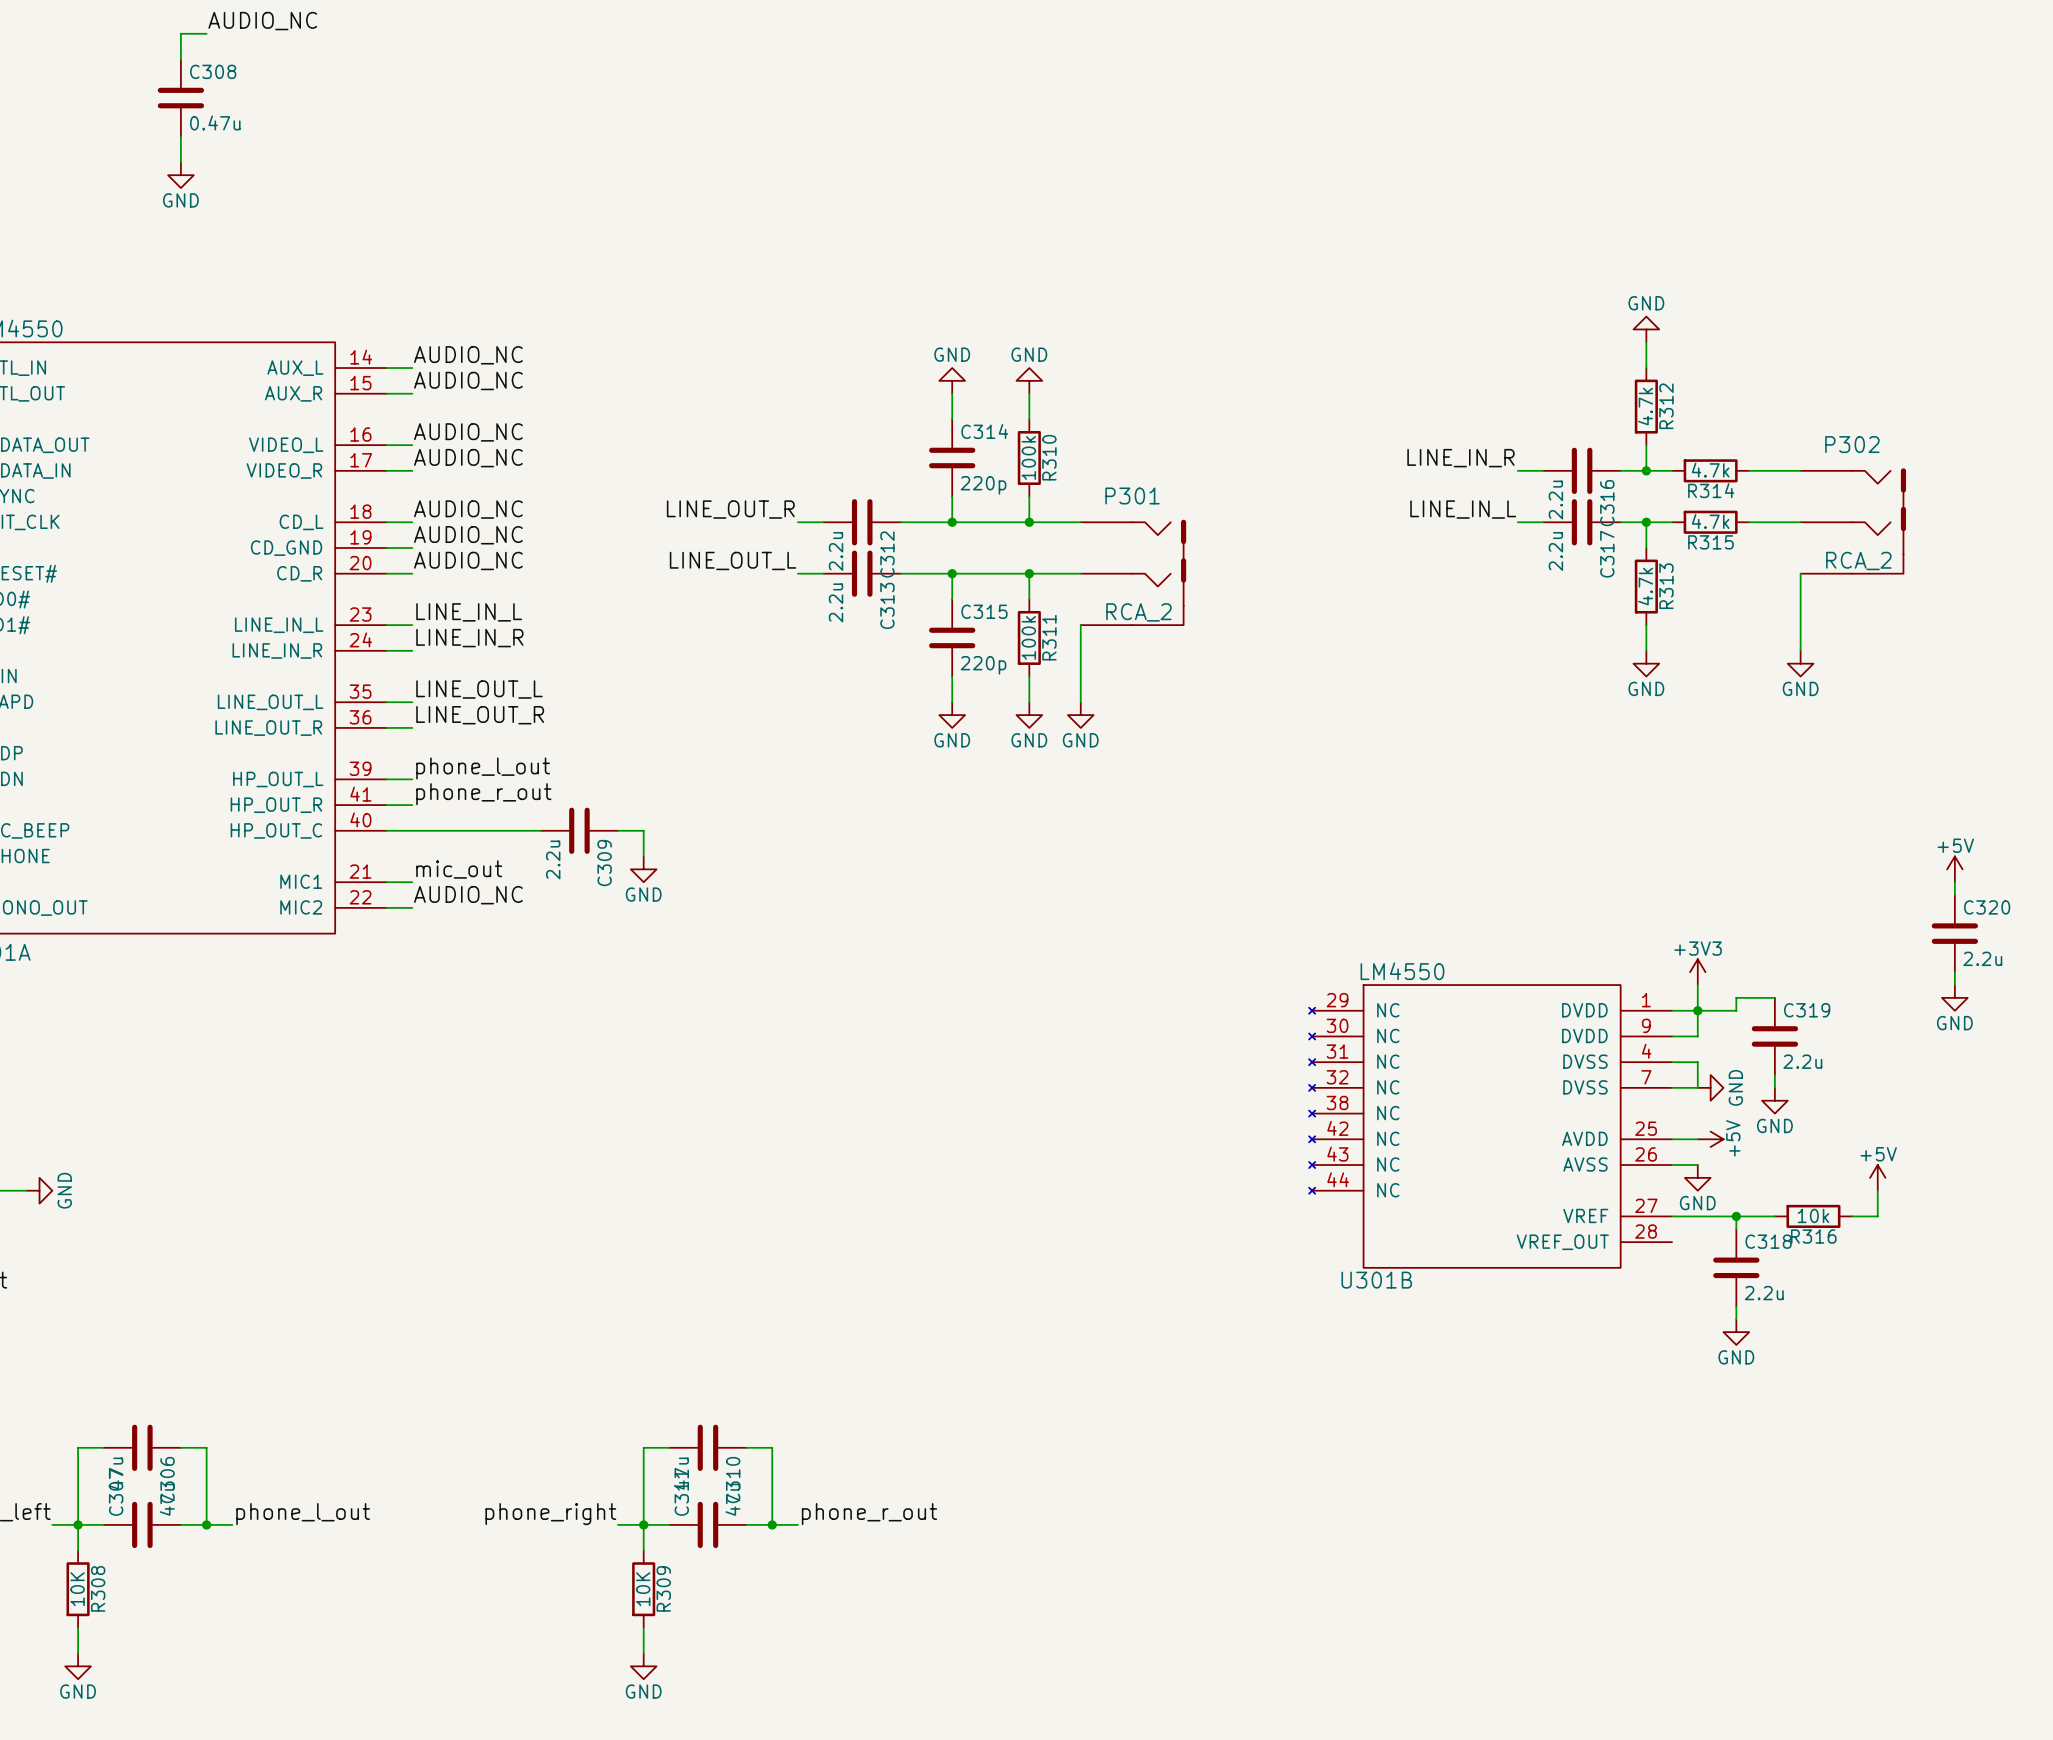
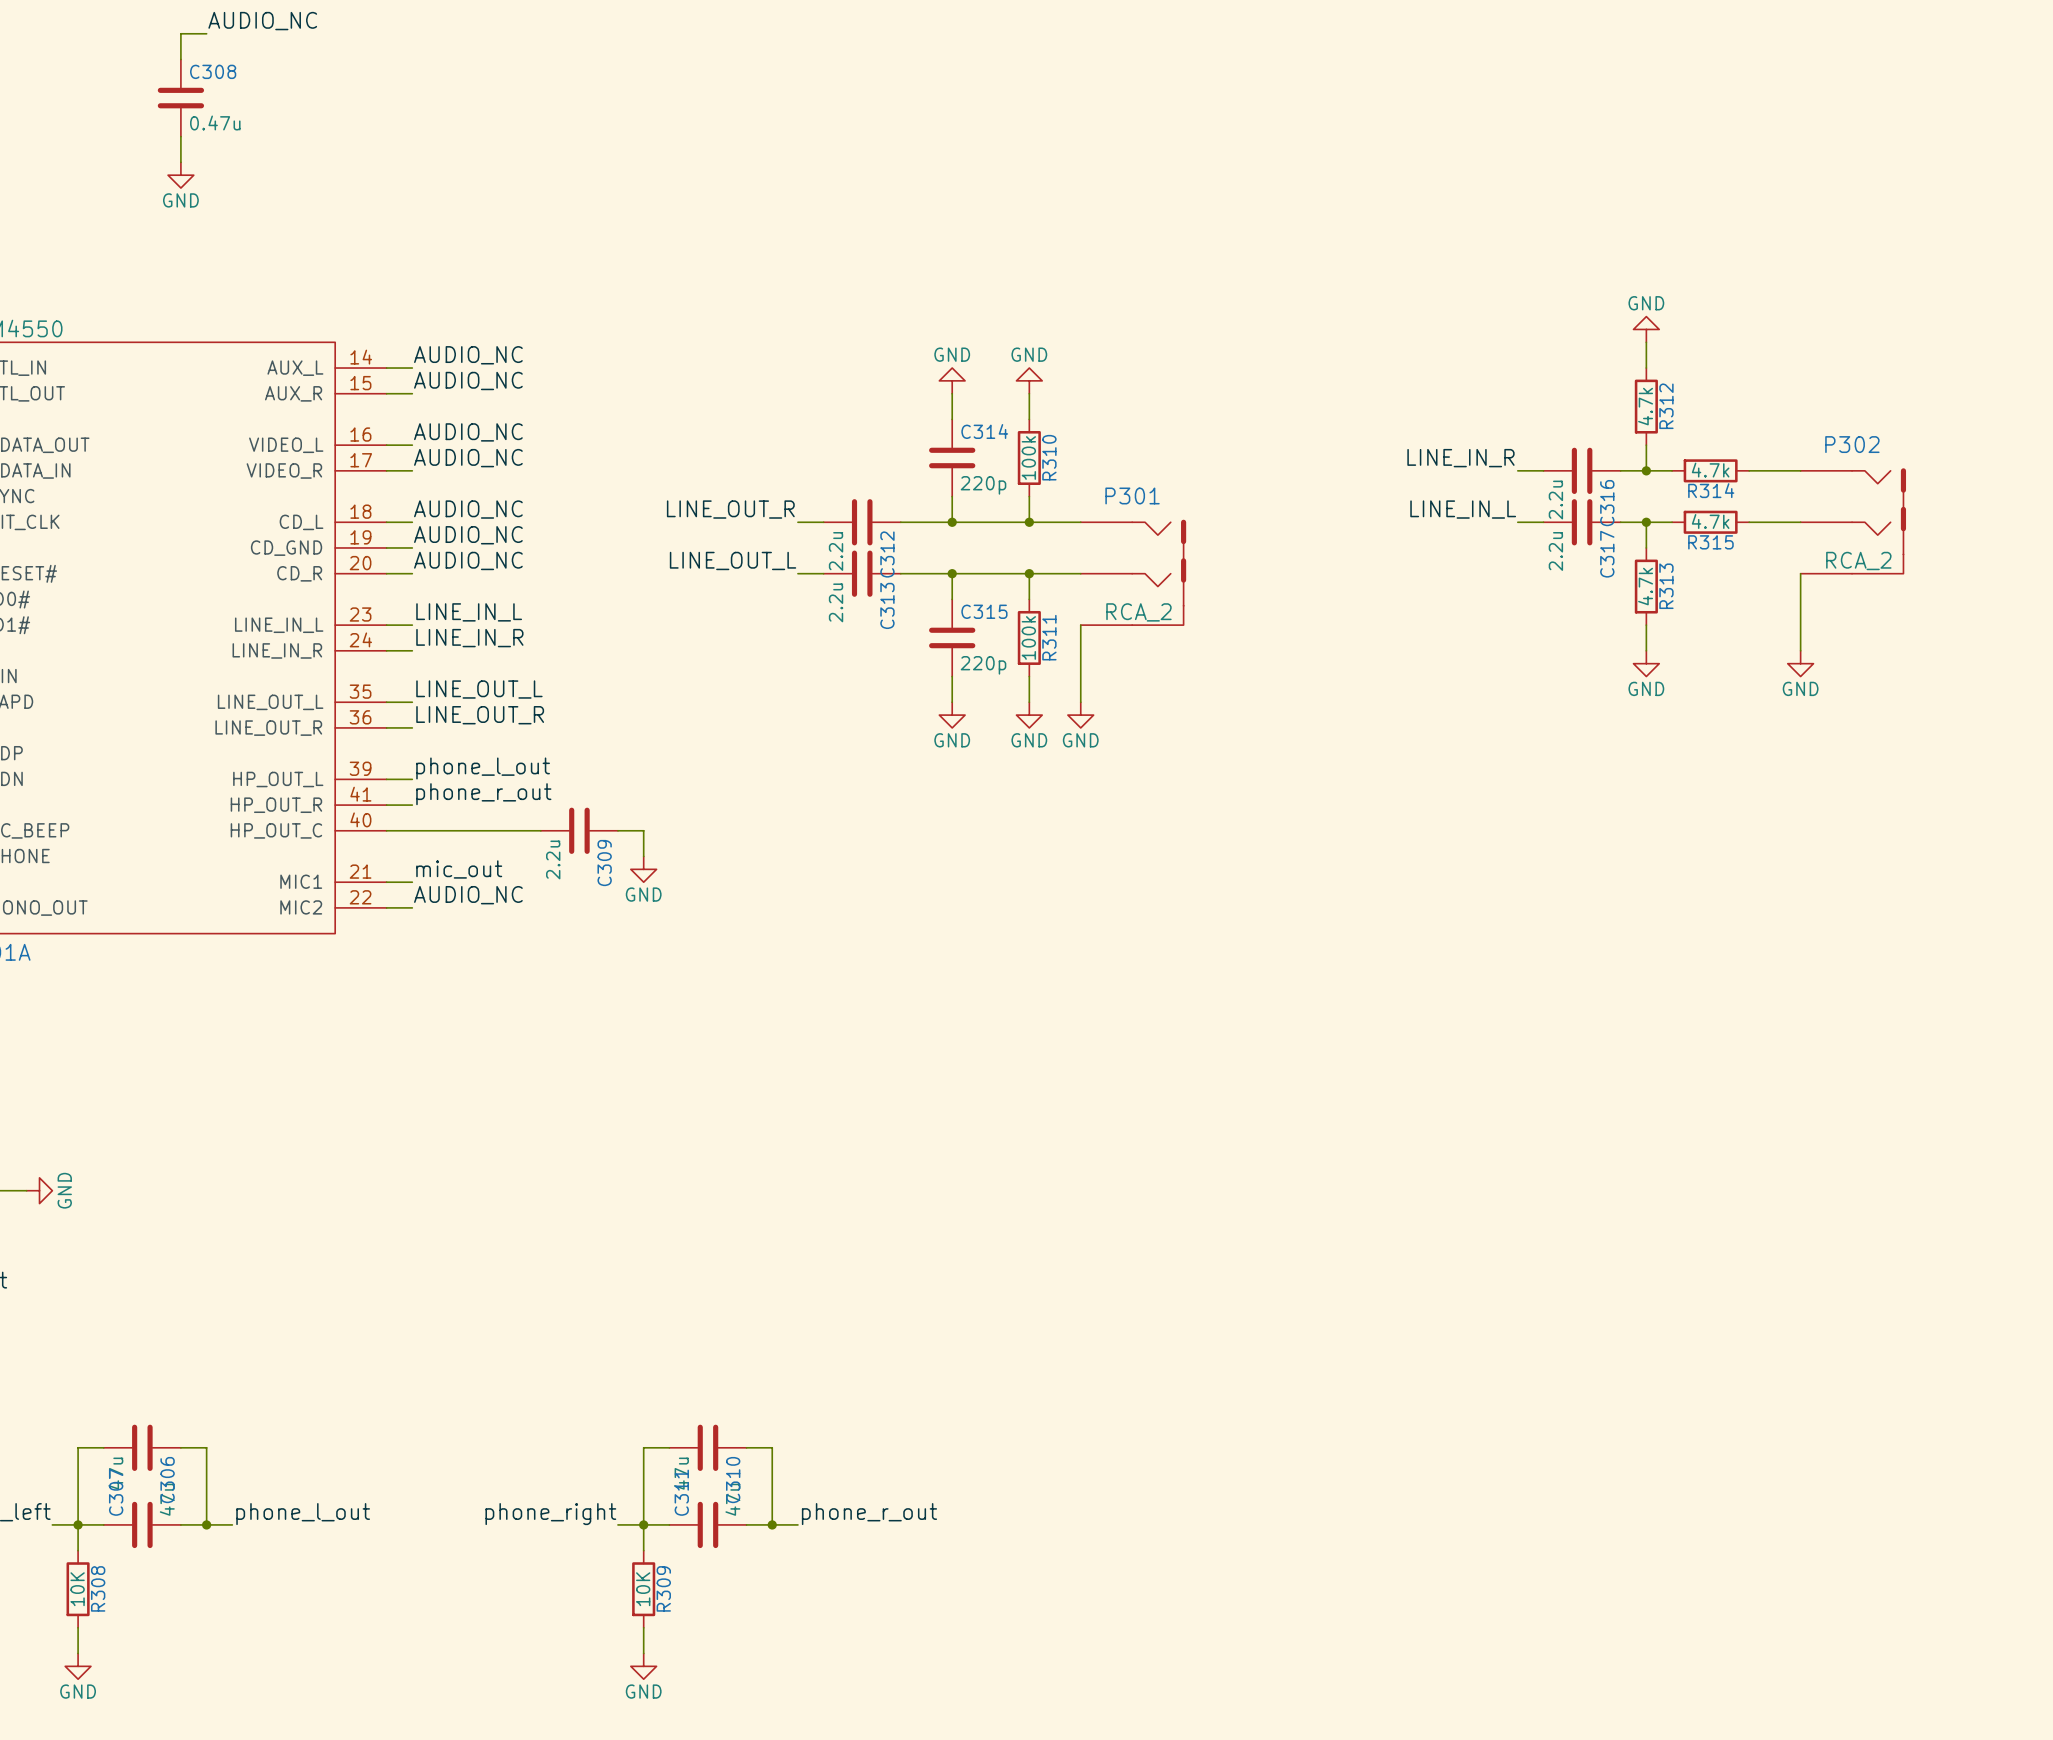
power symbol: +5V (1954, 869) -> none
wire: (1954, 882) (1954, 895) -> none
C320: 2.2u (1954, 933) -> none
power symbol: +3V3 (1697, 972) -> none
wire: (1954, 972) (1954, 985) -> none
wire: (1697, 985) (1697, 1036) (1672, 1036) -> none
wire: (1774, 997) (1736, 997) (1736, 1010) (1672, 1010) -> none
power symbol: GND (1954, 997) -> none
junction: (1697, 1010) -> none
C319: 2.2u (1774, 1036) -> none
wire: (1672, 1062) (1697, 1062) (1697, 1087) (1672, 1087) -> none
wire: (1774, 1075) (1774, 1087) -> none
power symbol: GND (1710, 1087) -> none
power symbol: GND (1774, 1100) -> none
U301B: LM4550 (1490, 1126) -> none
wire: (1672, 1139) (1697, 1139) -> none
power symbol: +5V (1710, 1139) -> none
wire: (1672, 1165) (1697, 1165) -> none
power symbol: GND (1697, 1177) -> none
power symbol: +5V (1877, 1177) -> none
wire: (1877, 1190) (1877, 1216) (1852, 1216) -> none
wire: (1672, 1216) (1774, 1216) -> none
wire: (1736, 1216) (1736, 1229) -> none
junction: (1736, 1216) -> none
R316: 10k (1813, 1216) -> none
C318: 2.2u (1736, 1267) -> none
wire: (1736, 1306) (1736, 1319) -> none
power symbol: GND (1736, 1332) -> none

